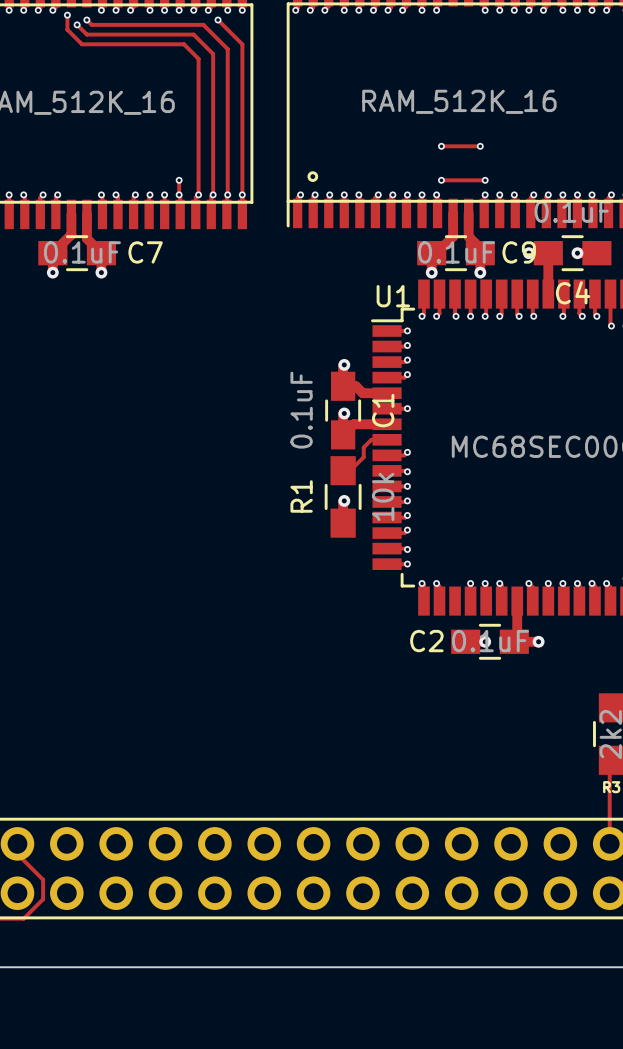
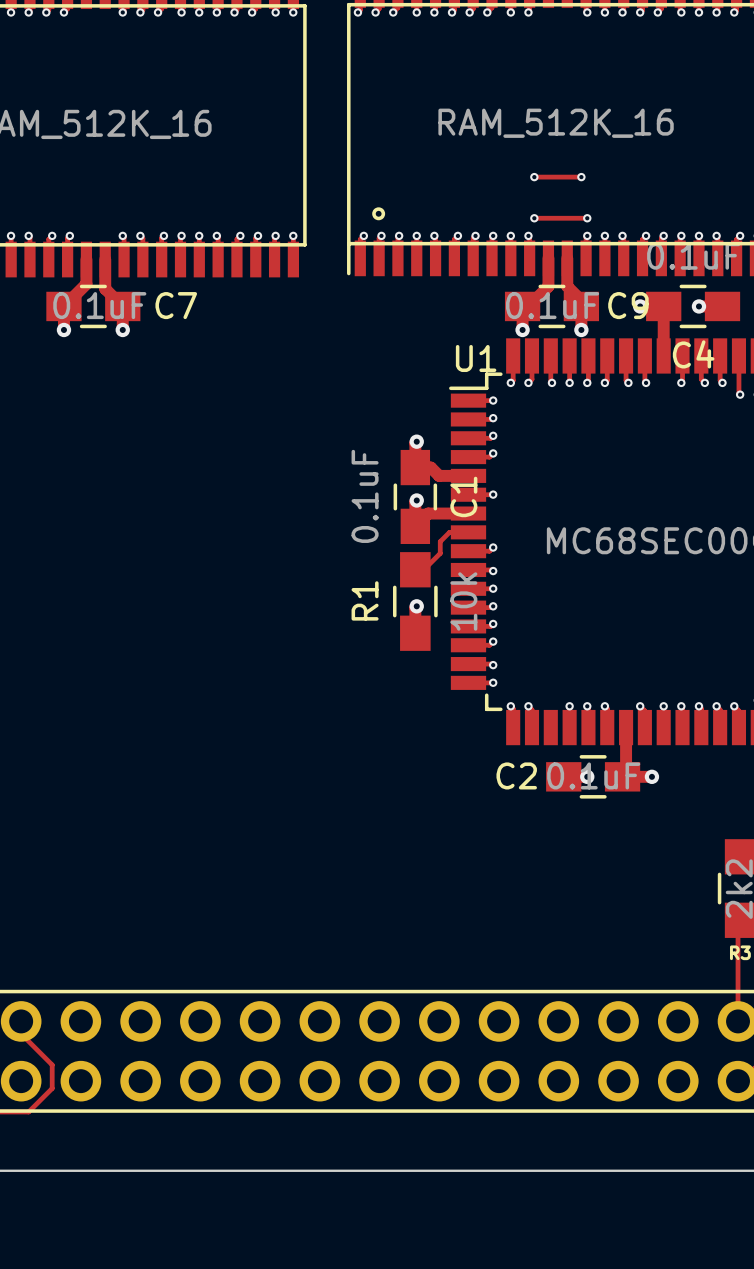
track: (67, 15) (67, 29) (81, 44) (184, 44) (198, 58) (198, 194) -> none
via: (67, 15) -> none
track: (86, 20) (91, 24) (203, 24) (227, 49) (227, 194) -> none
via: (86, 20) -> none
track: (218, 20) (242, 44) (242, 194) -> none
via: (218, 20) -> none
track: (77, 24) (86, 34) (193, 34) (213, 54) (213, 194) -> none
via: (77, 24) -> none
track: (179, 180) (179, 194) -> none
via: (179, 180) -> none

